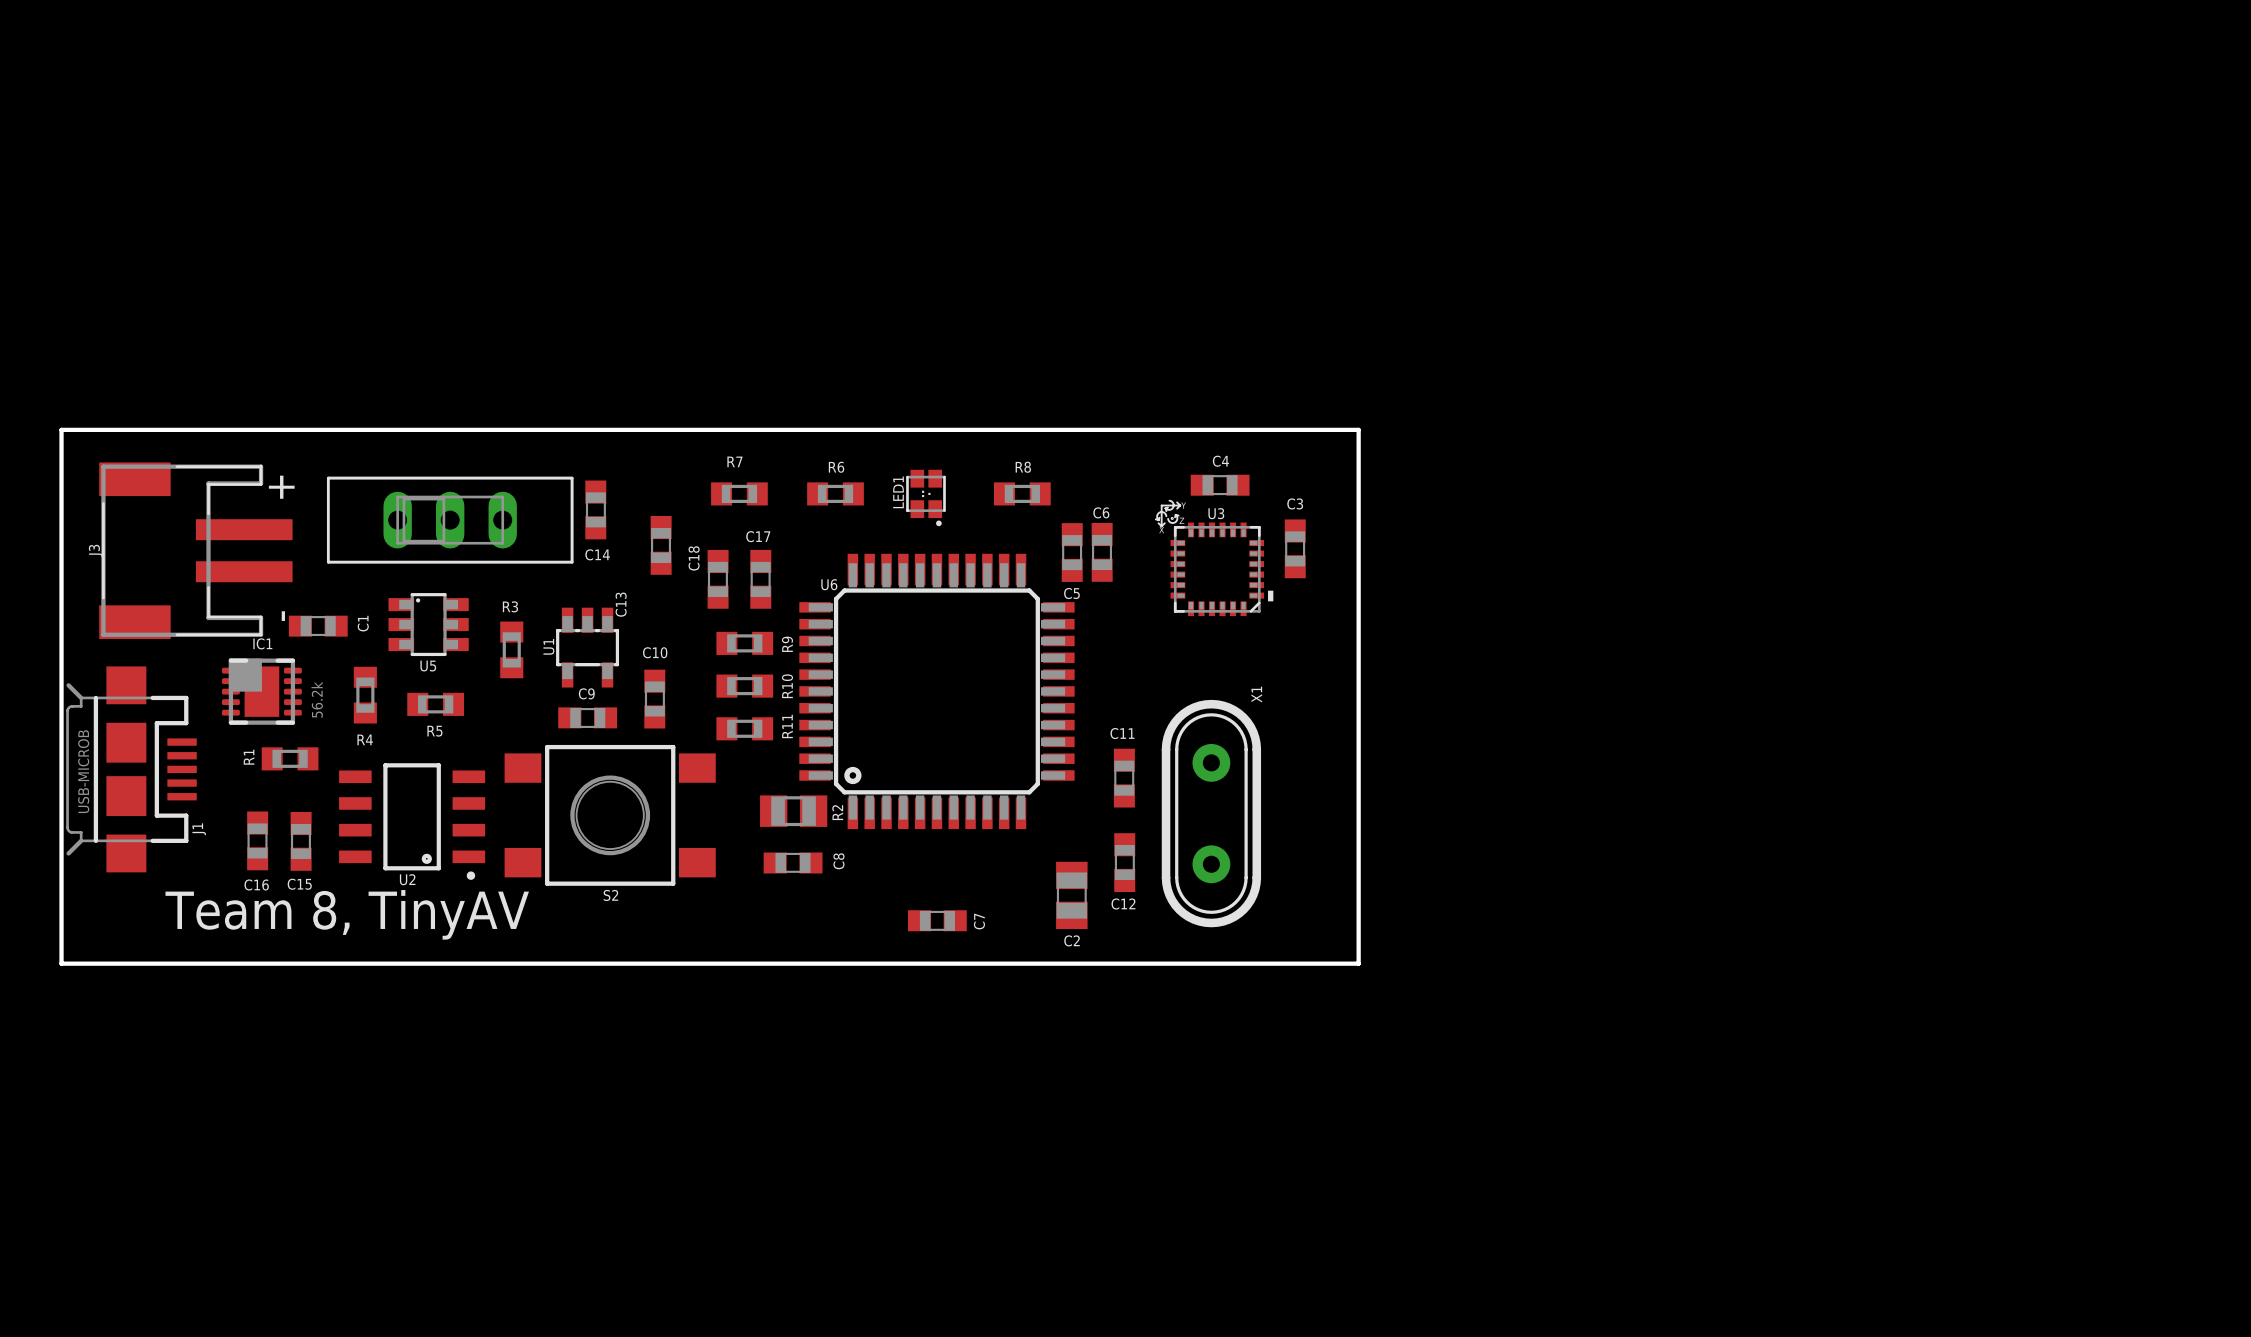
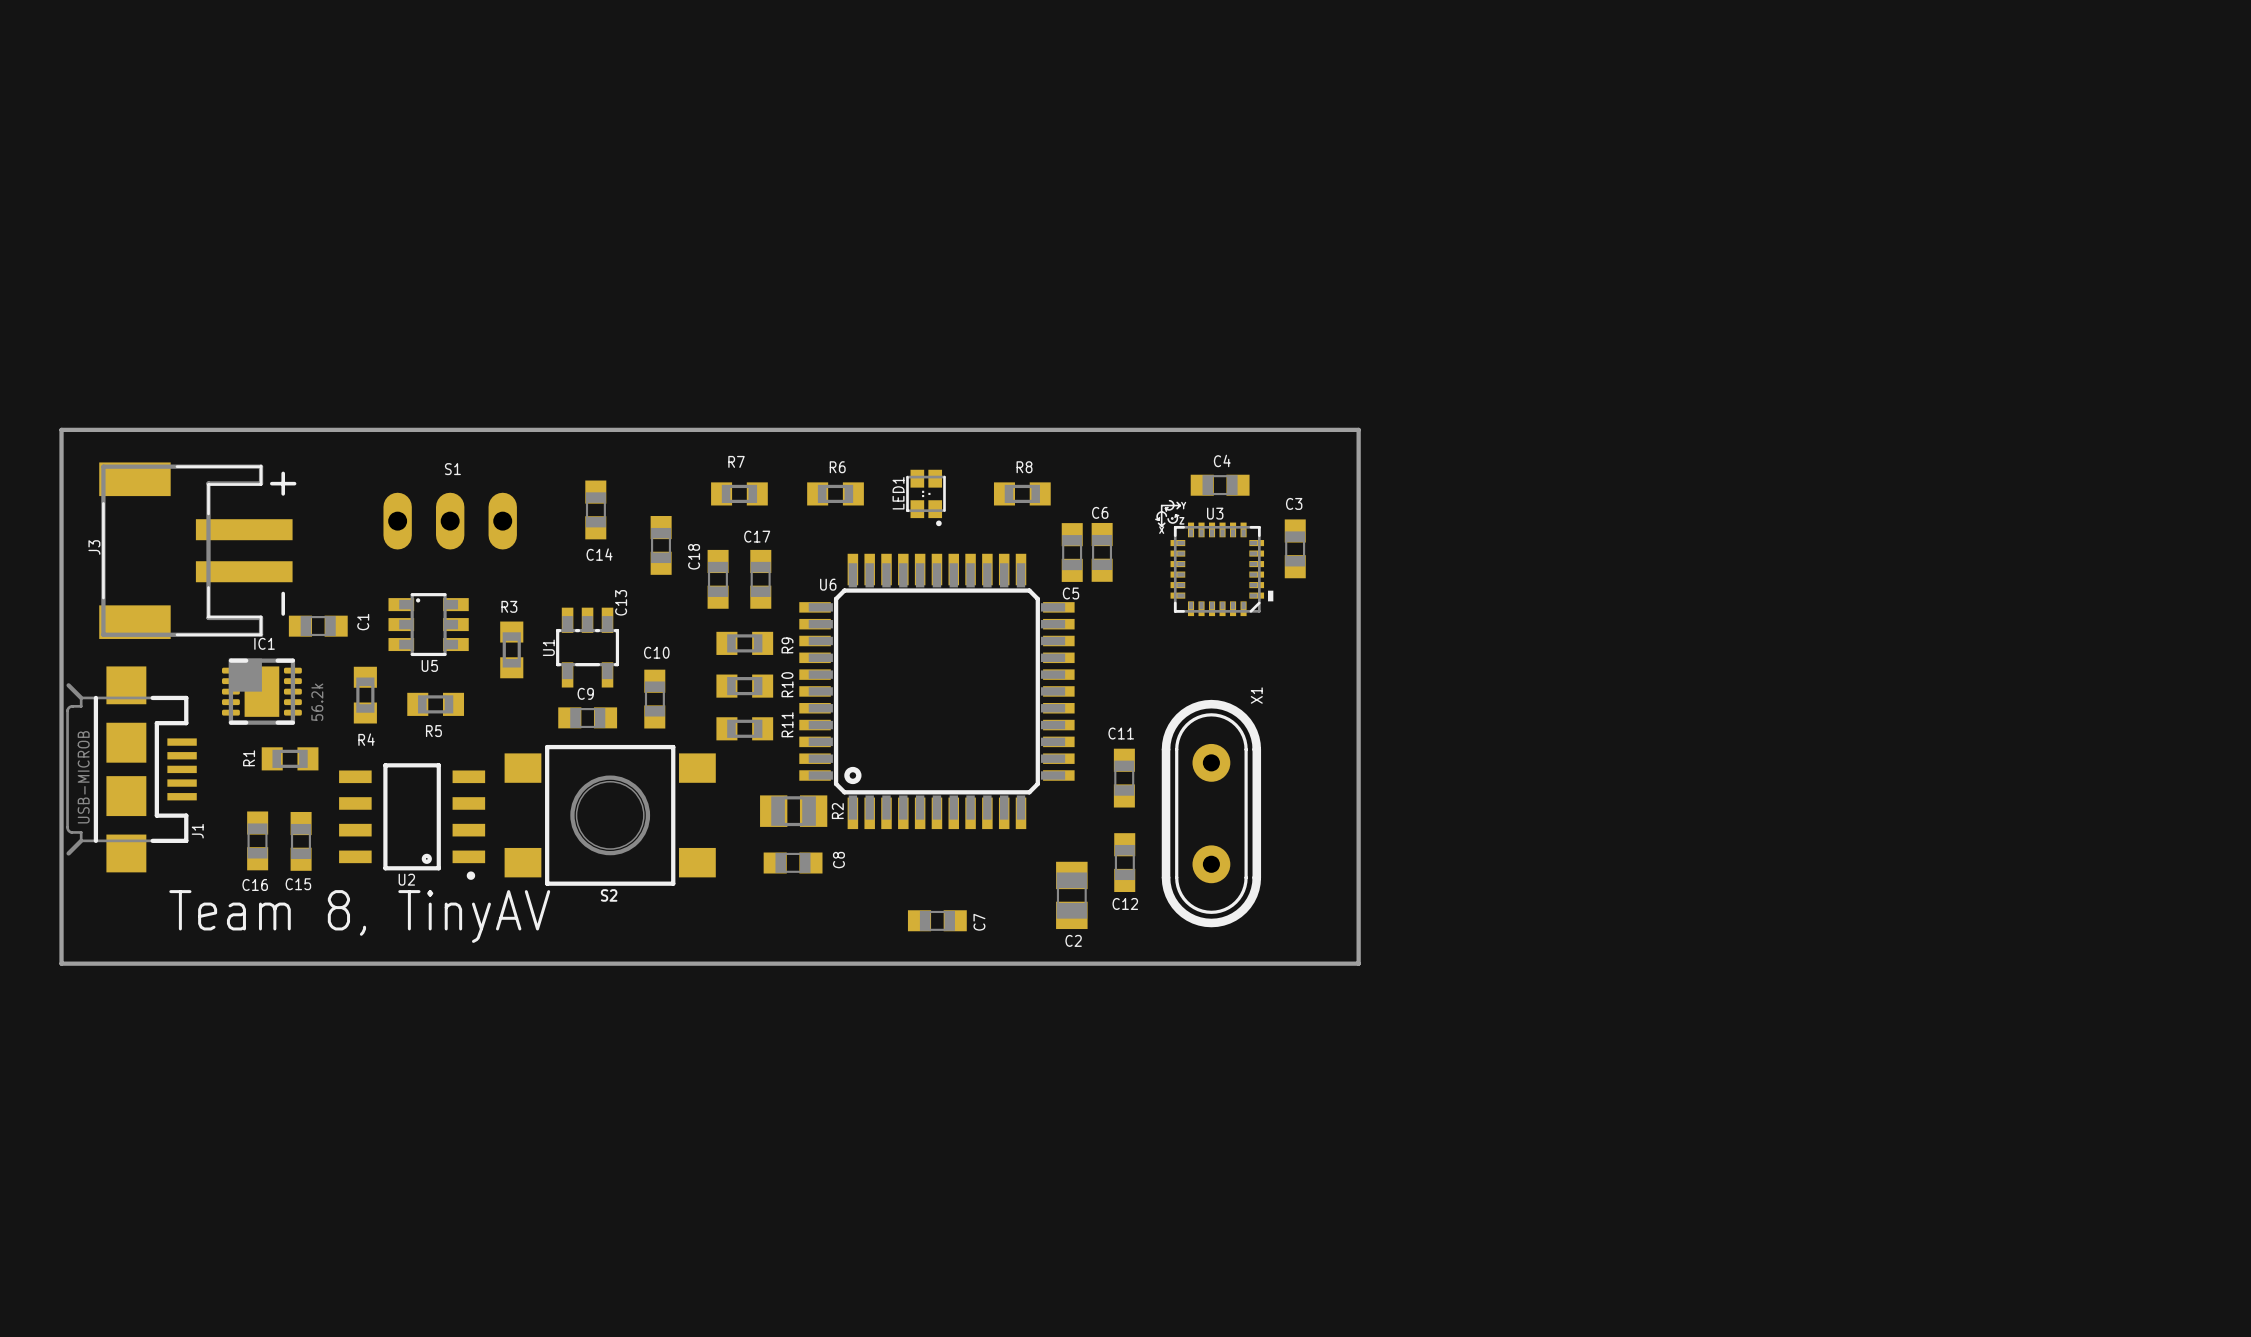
S1 side: top (450, 520) -> bottom (450, 521)

